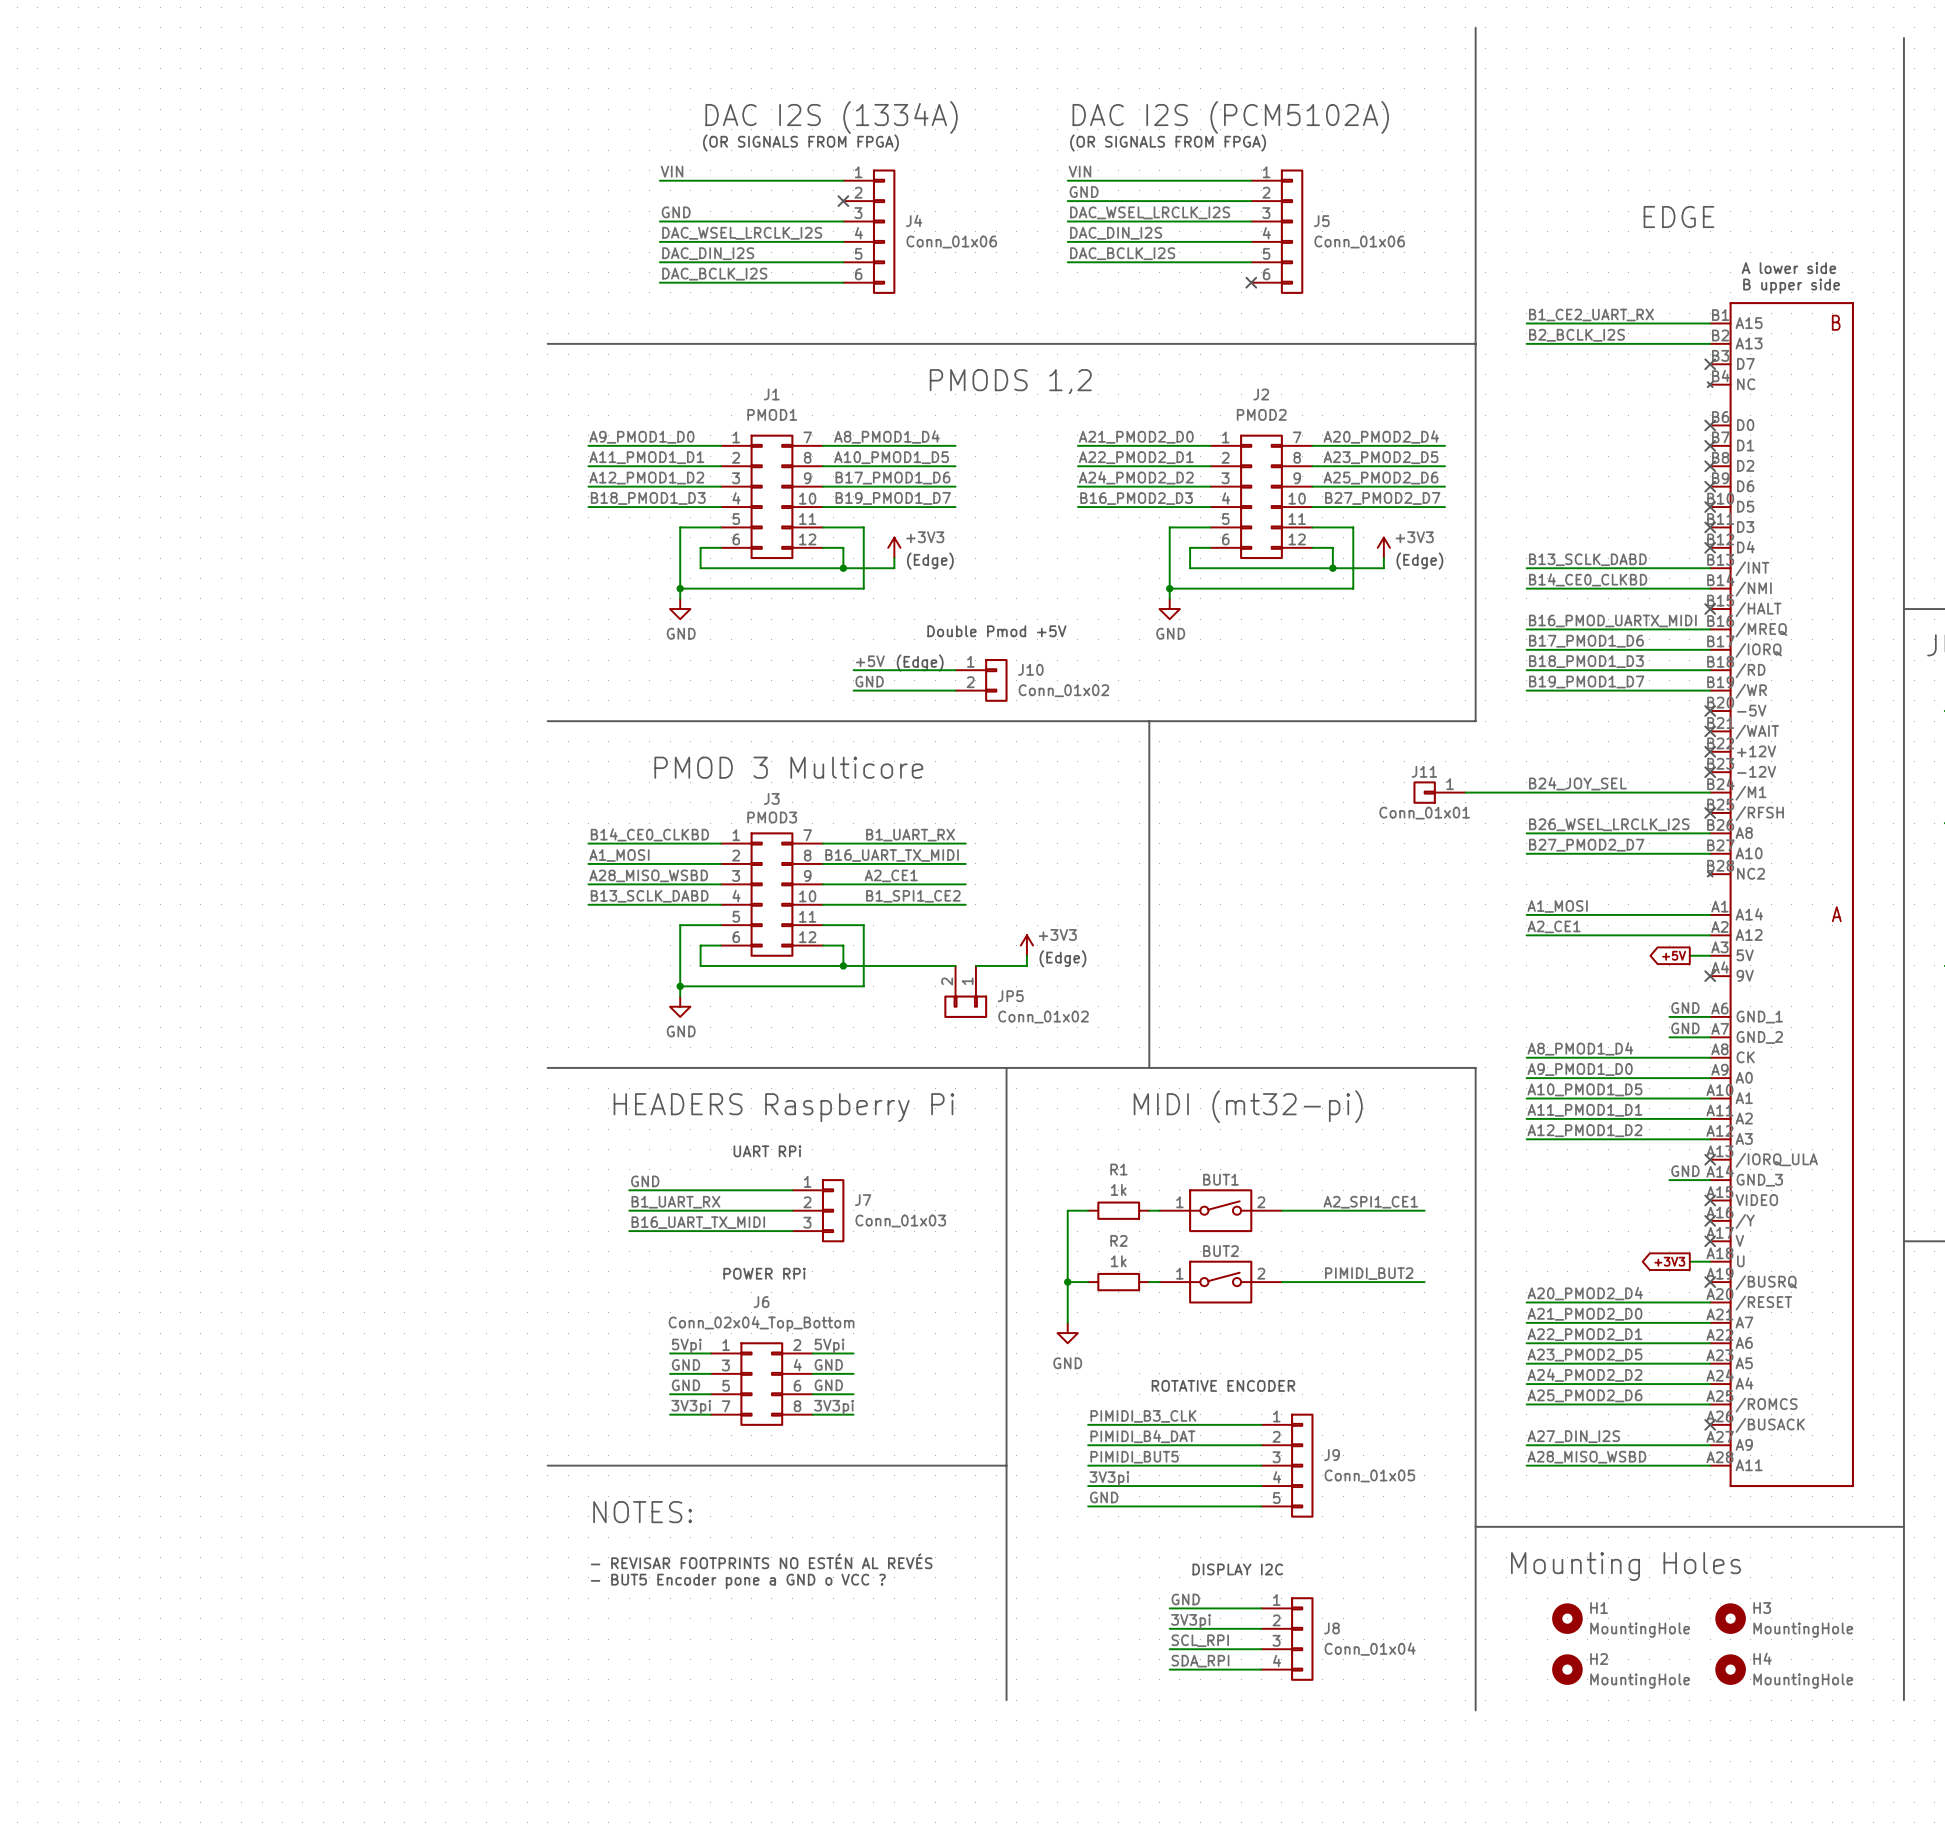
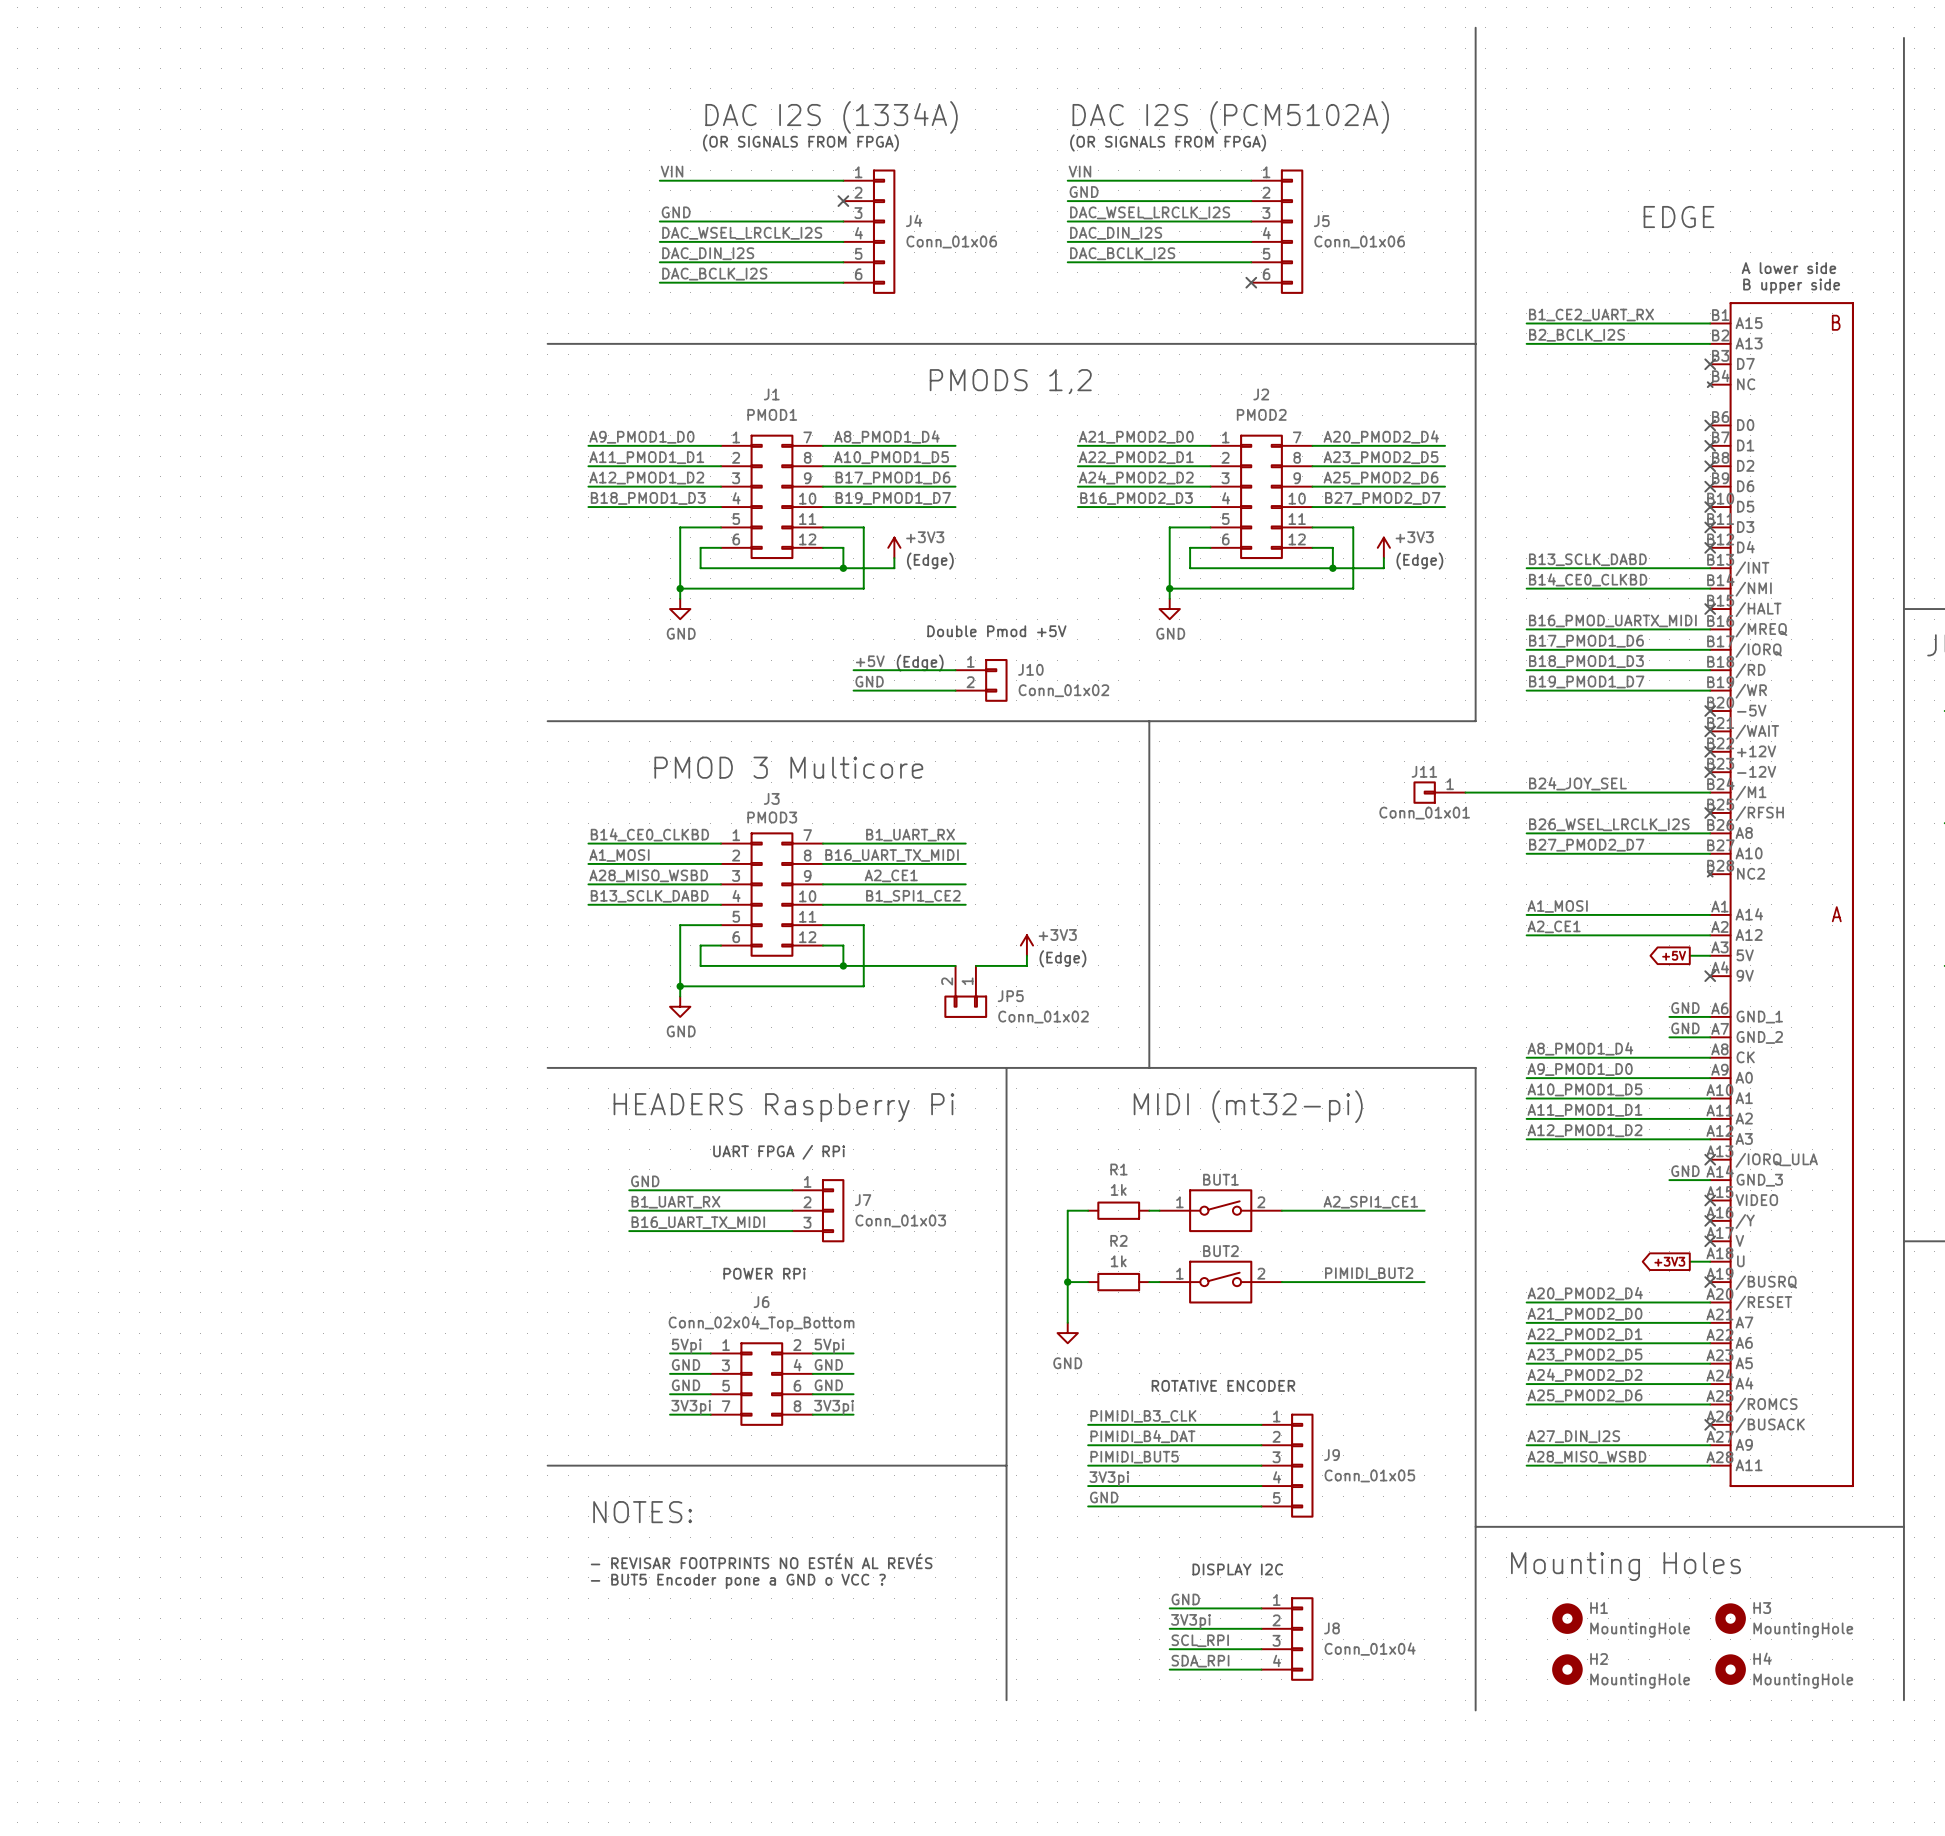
text: UART RPi (767, 1151) -> UART FPGA / RPi (779, 1152)

